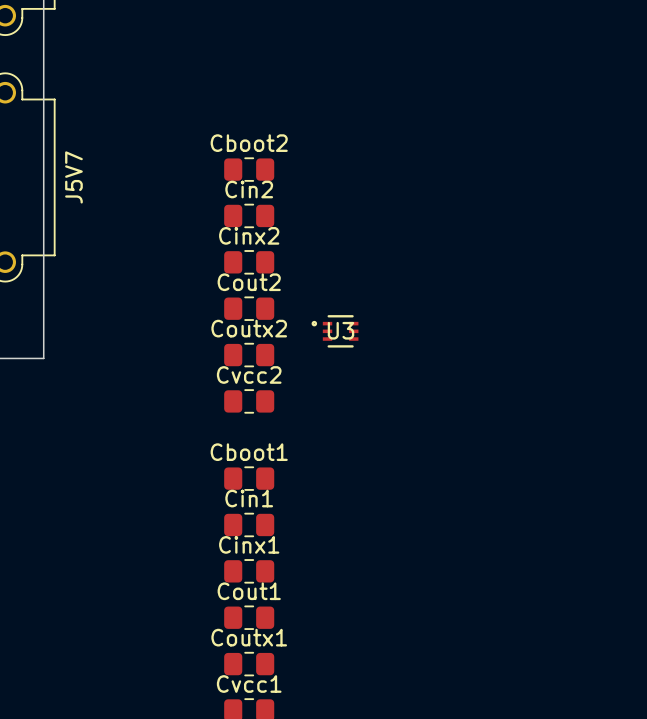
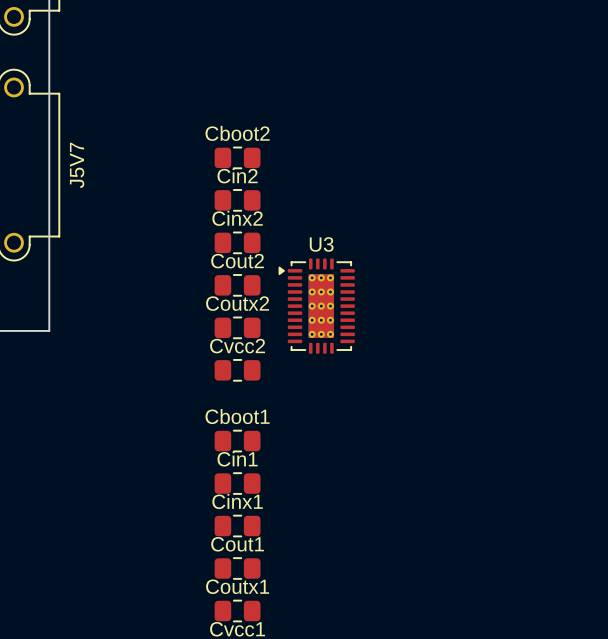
U3 footprint: [311, 315, 359, 348] -> [278, 258, 355, 354]
U3 name position: U3 (340, 330) -> U3 (321, 244)

